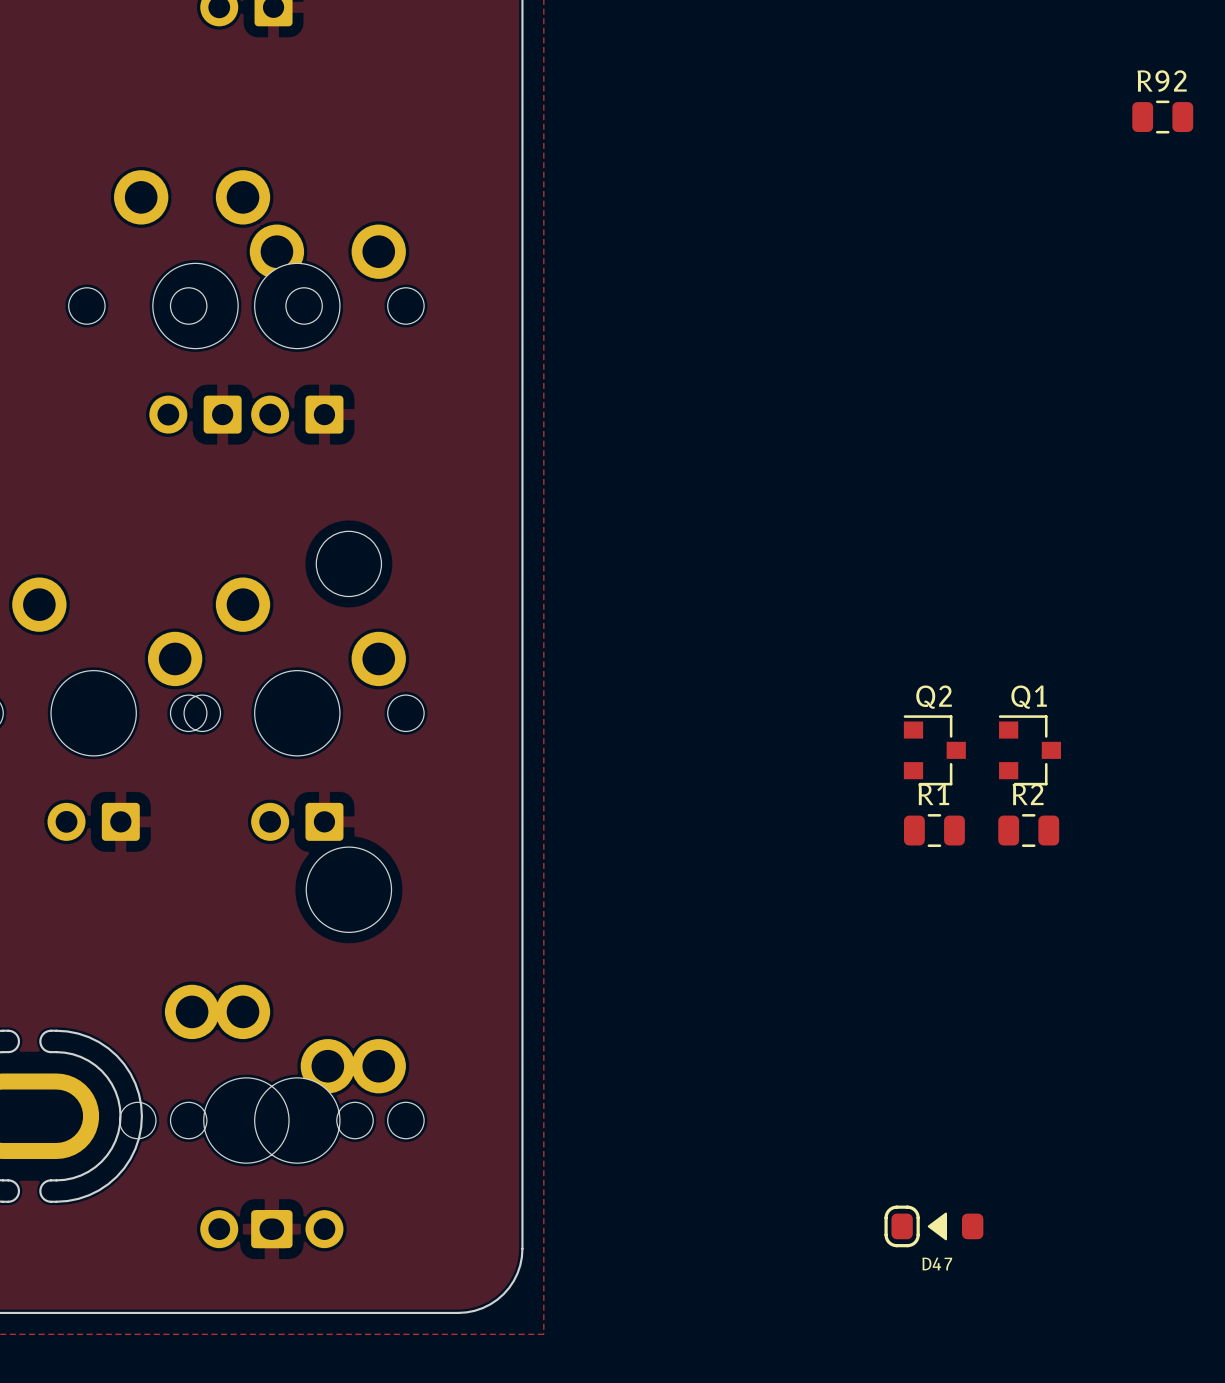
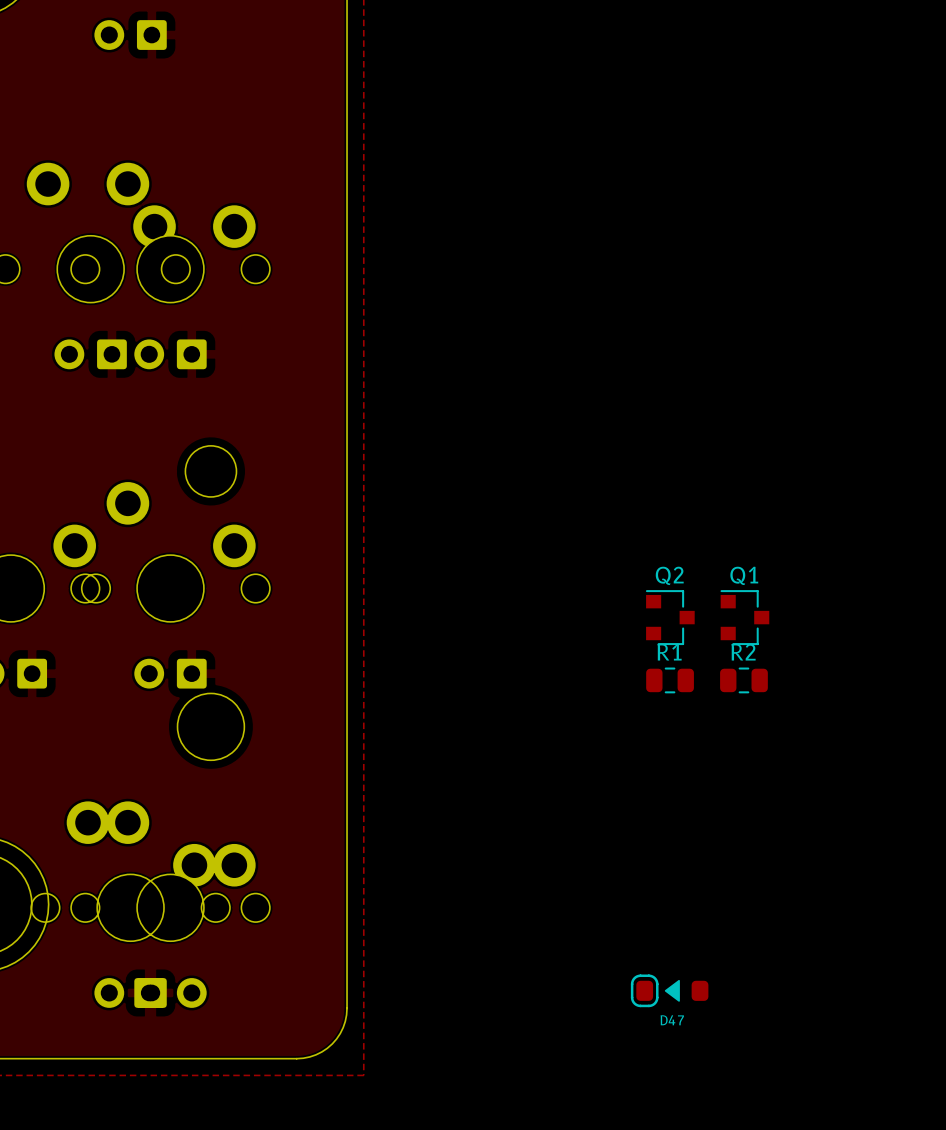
R92: (1162, 117) -> none

